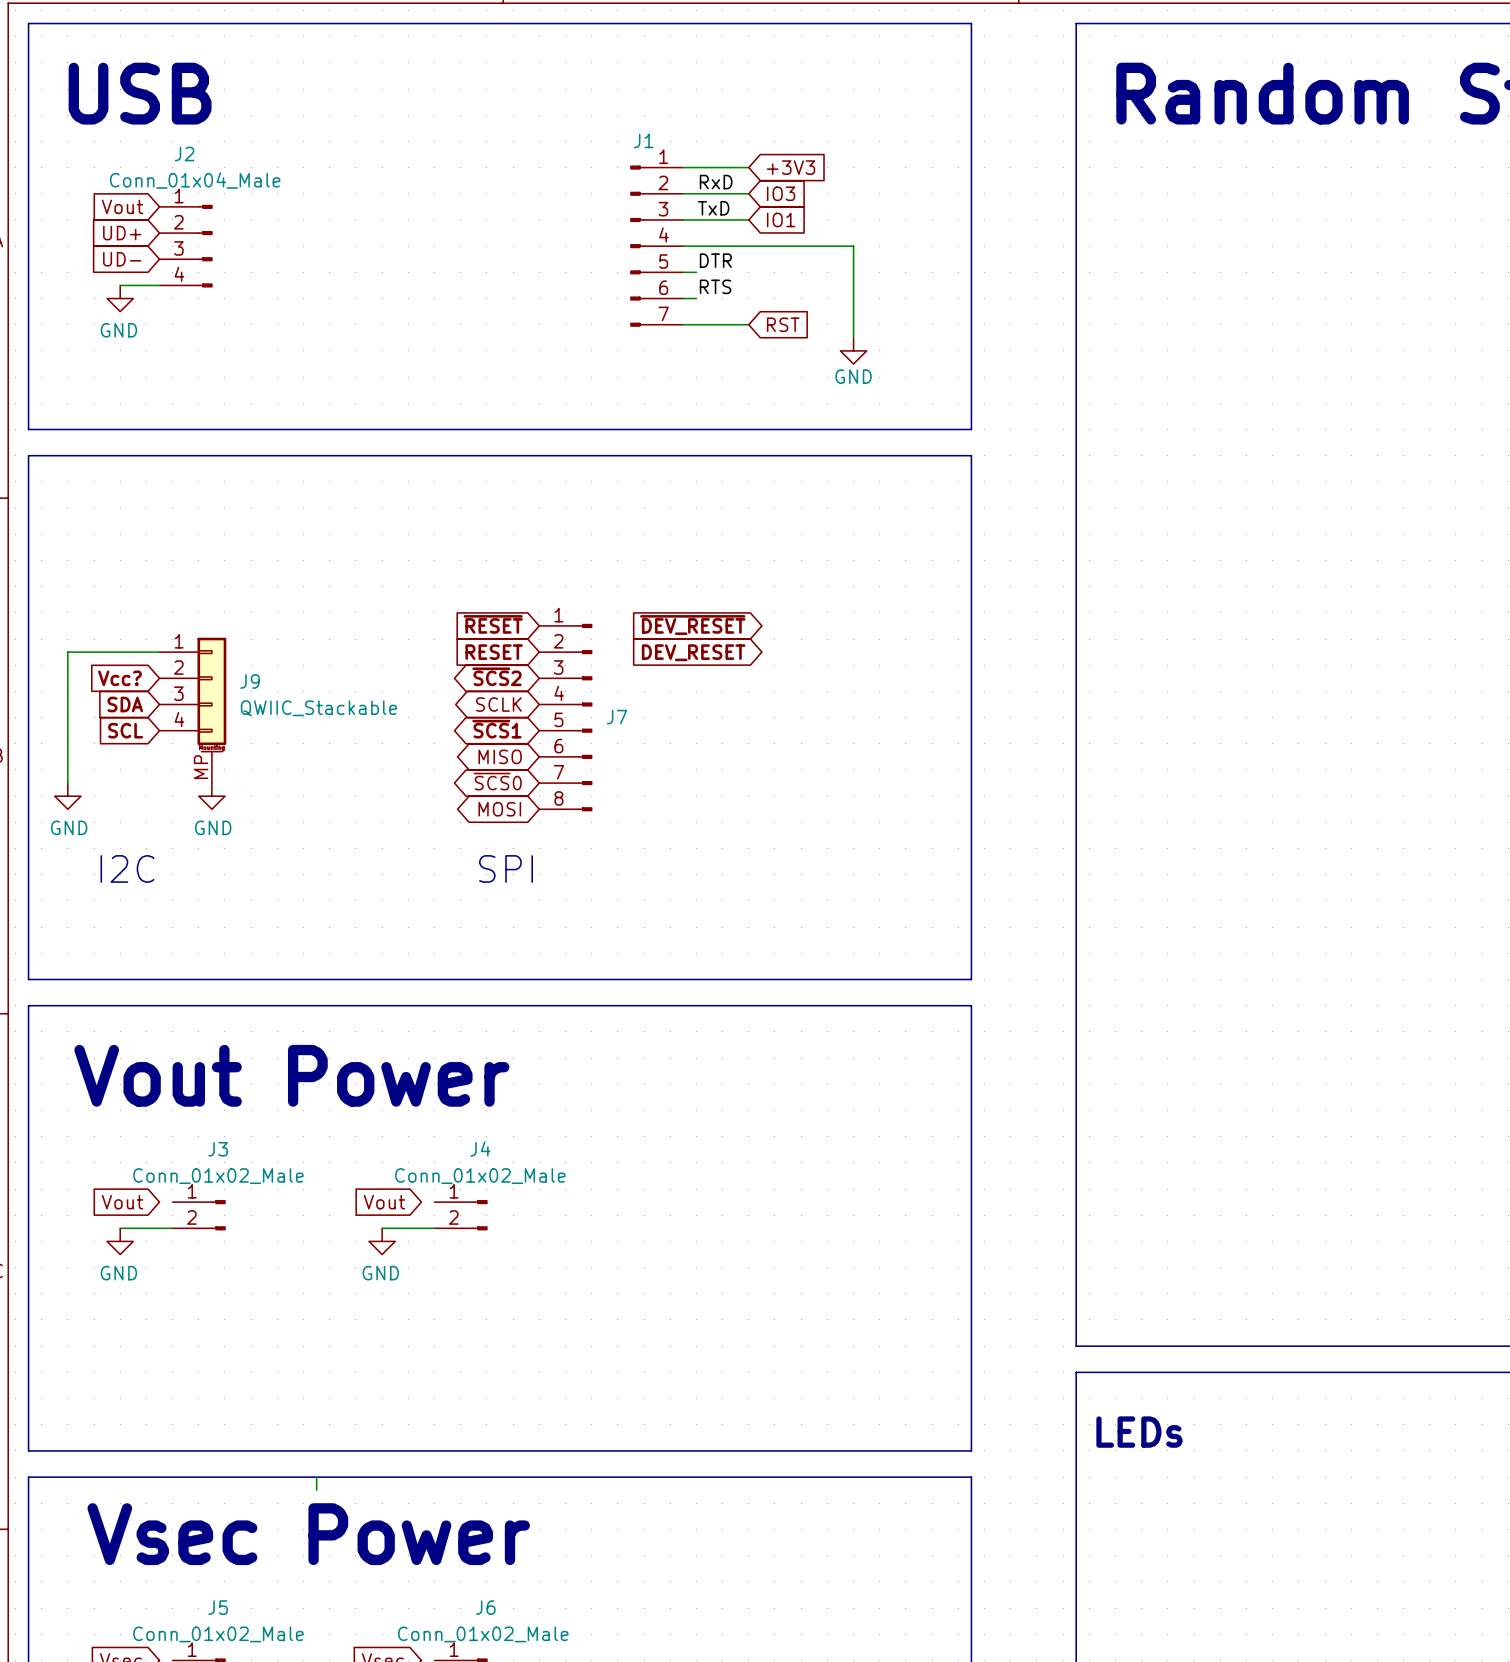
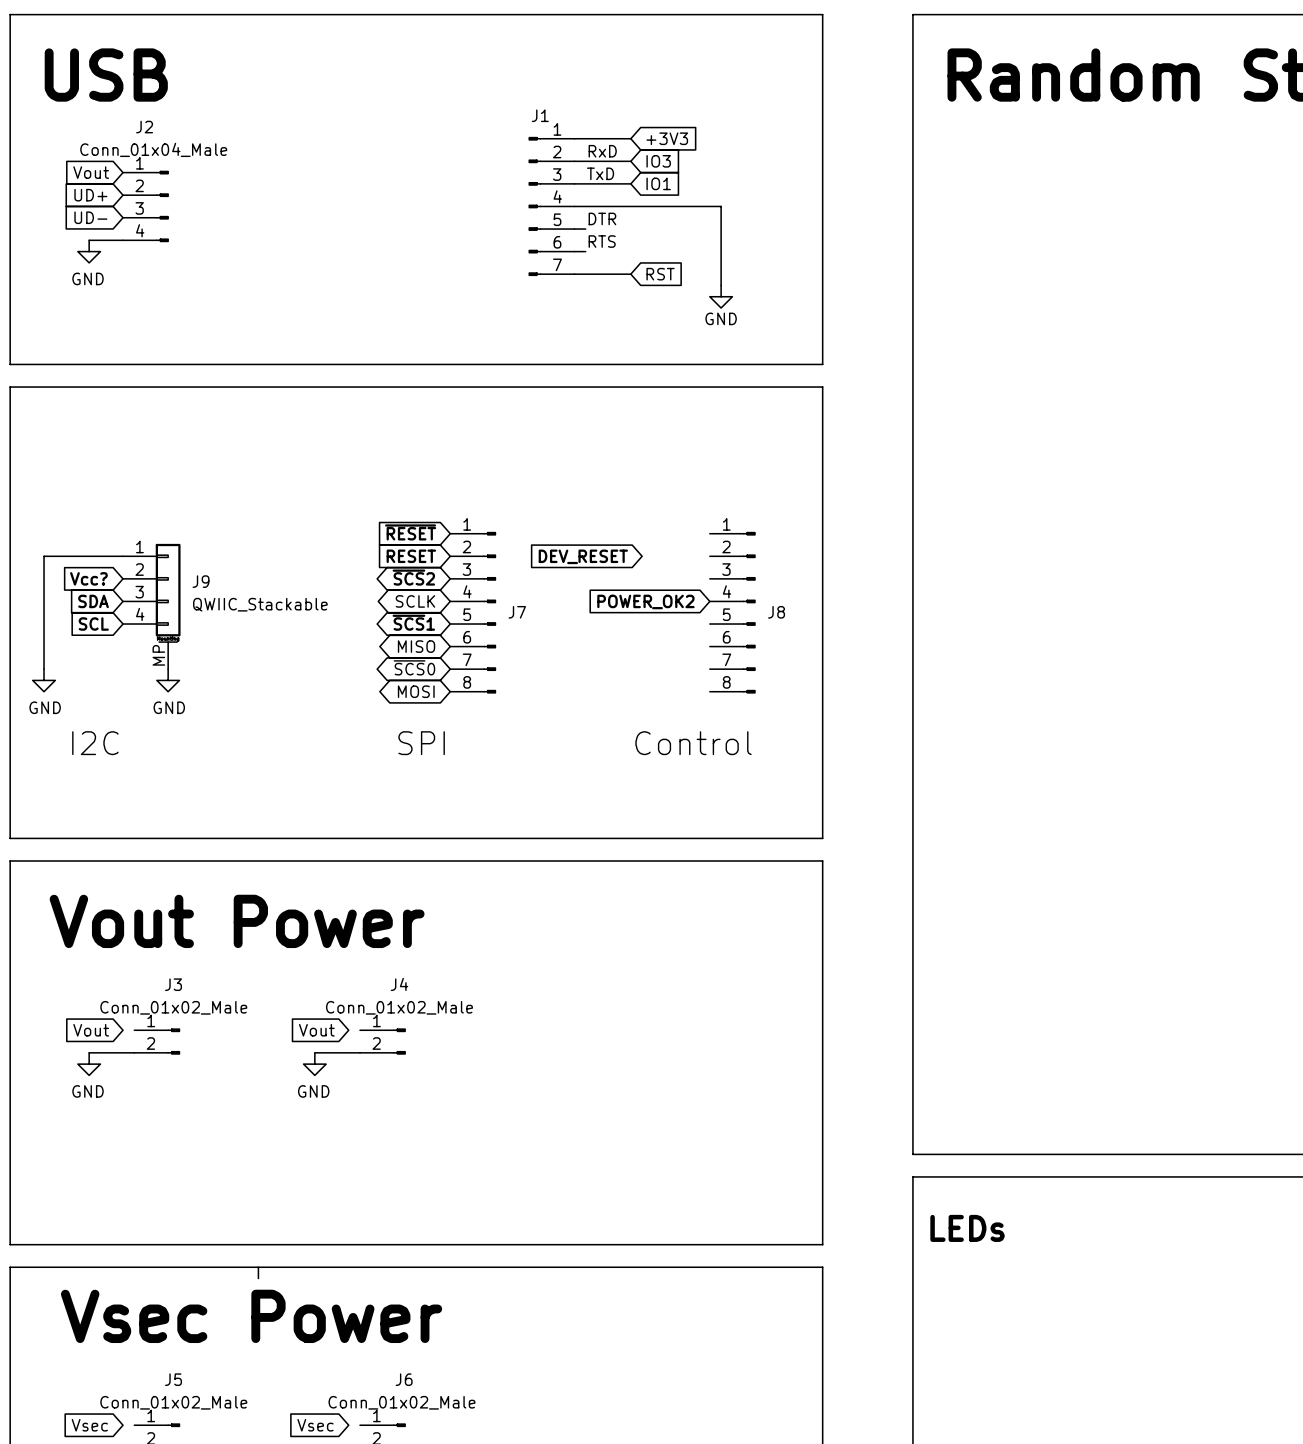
global label: ~{DEV_RESET} (692, 625) -> none
global label: none -> POWER_OK2 (645, 601)
J8: none -> (732, 612)
text: none -> Control (693, 743)

